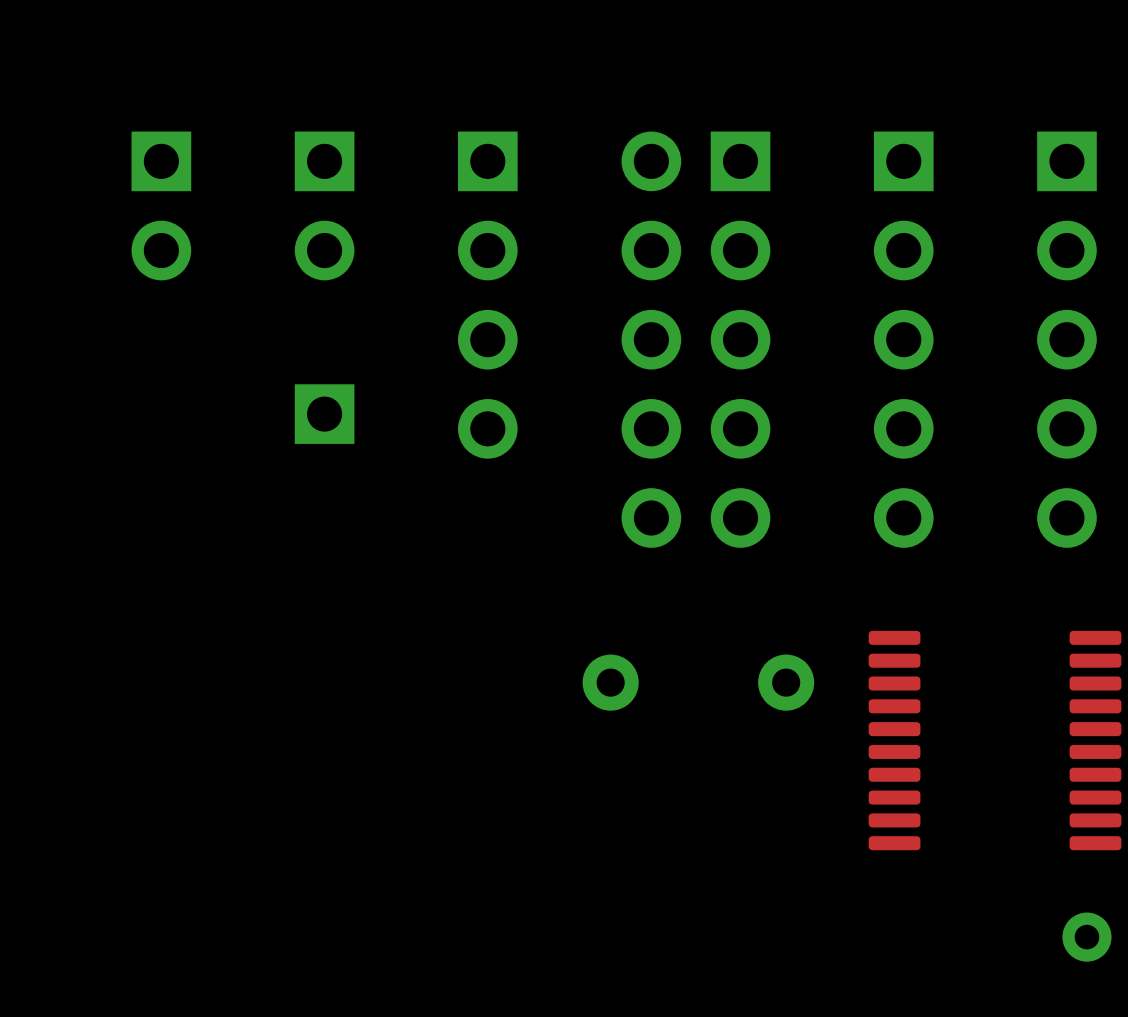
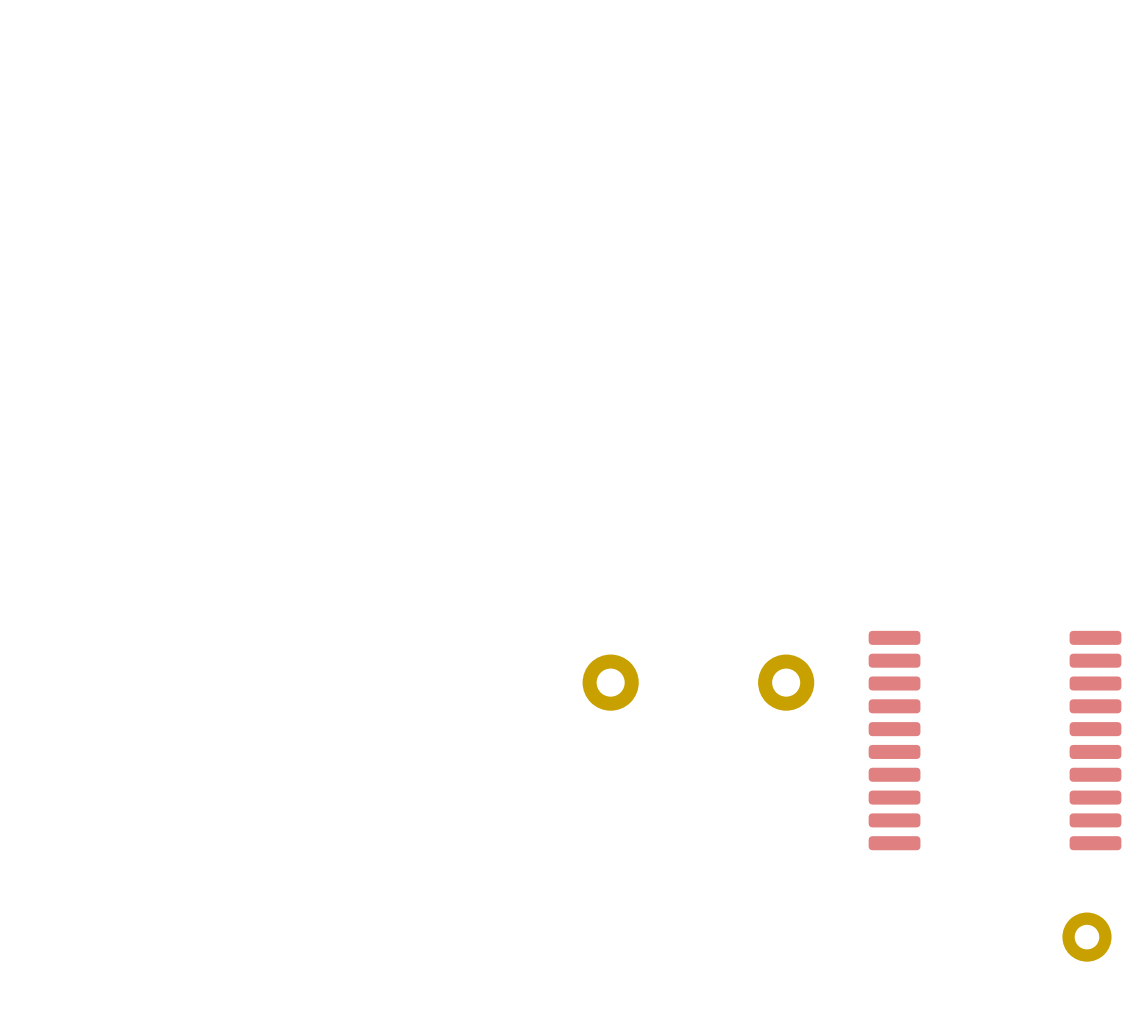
part: (161, 205) -> none
part: (324, 205) -> none
part: (487, 295) -> none
part: (695, 339) -> none
part: (903, 339) -> none
part: (1066, 339) -> none
part: (324, 414) -> none

